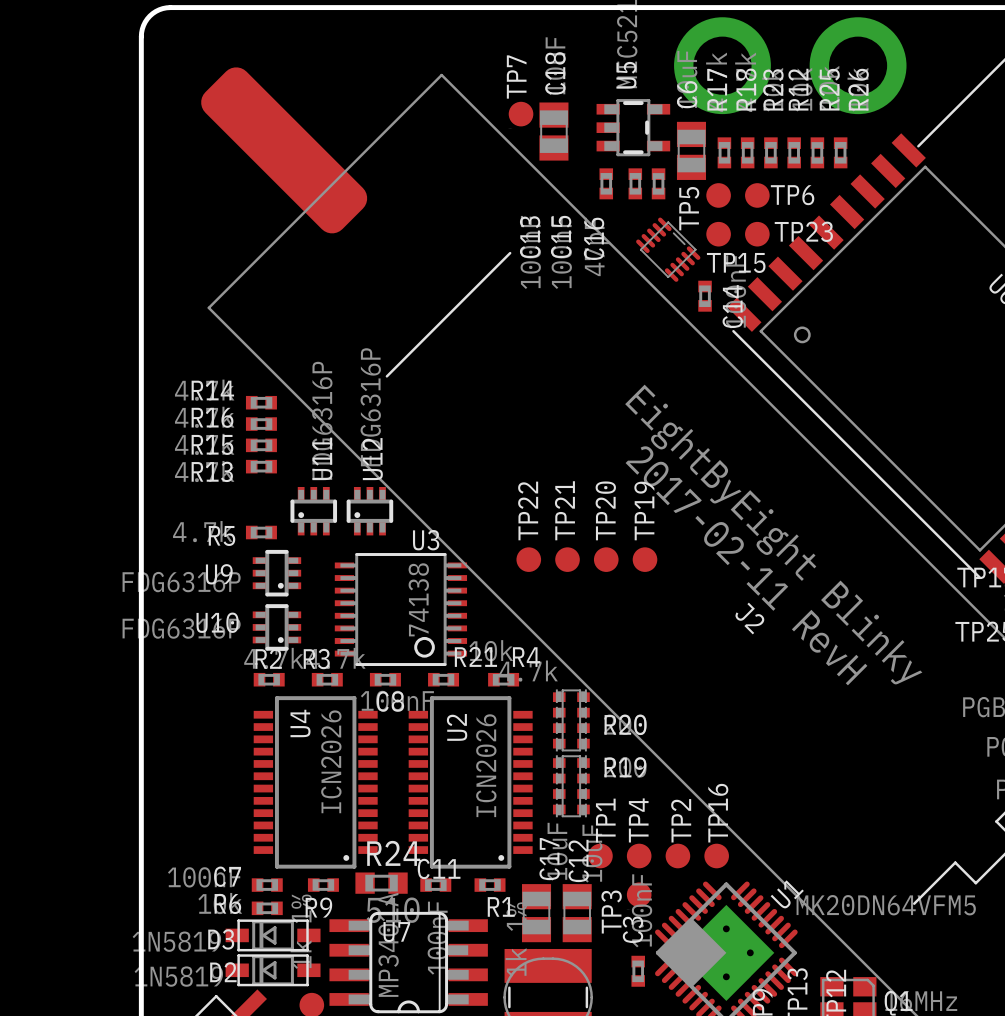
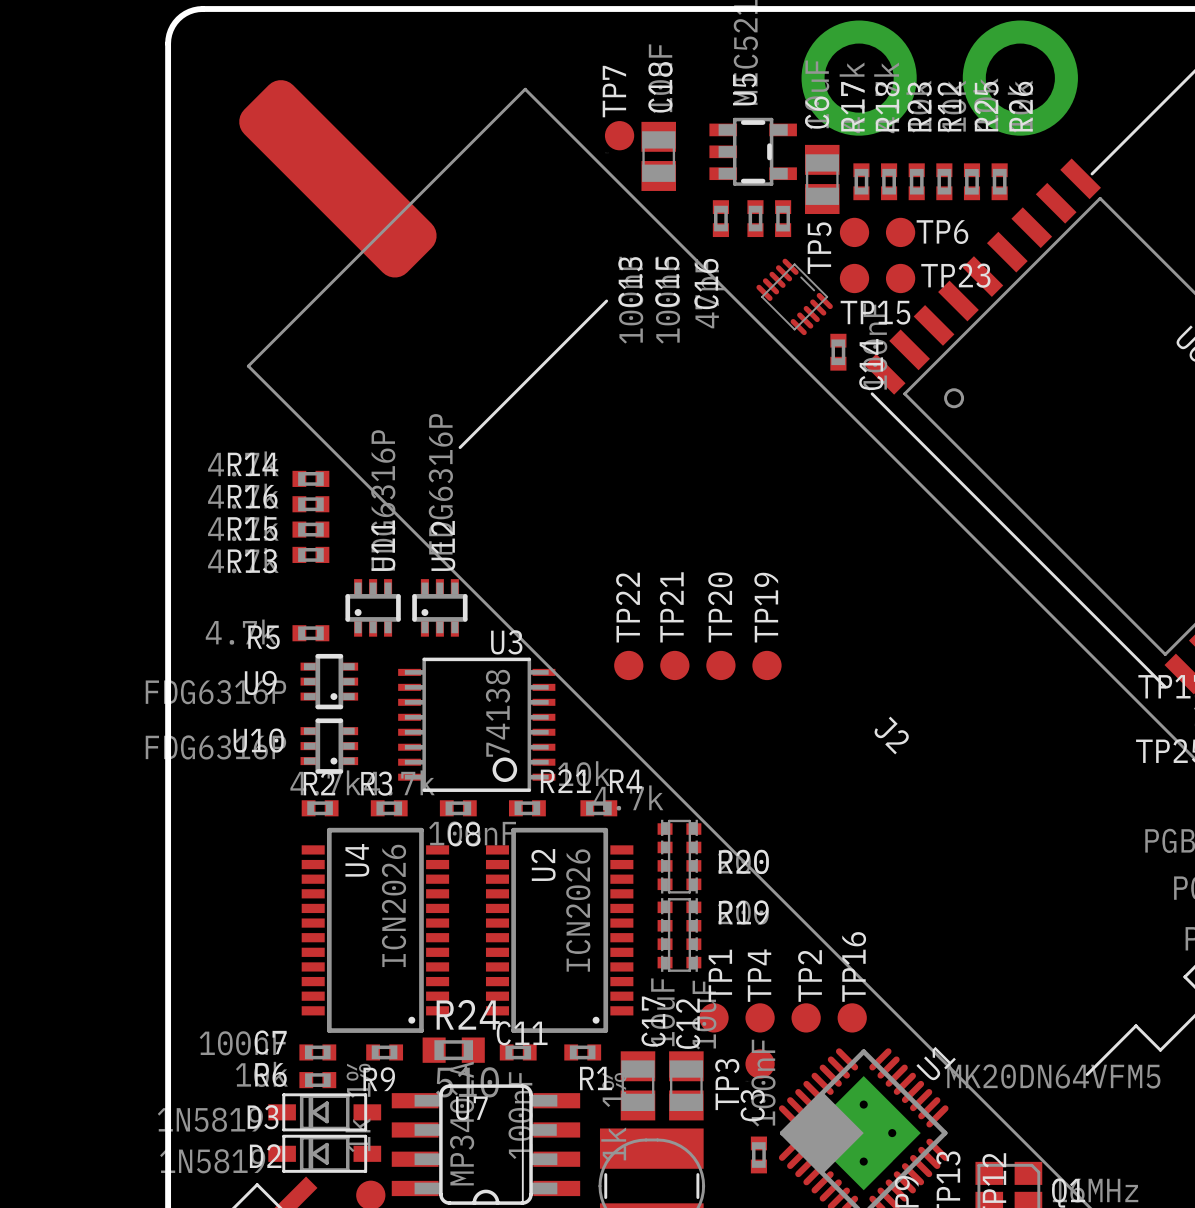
text: EightByEight Blinky (773, 534) -> none
text: 2017-02-11 RevH (746, 565) -> none

